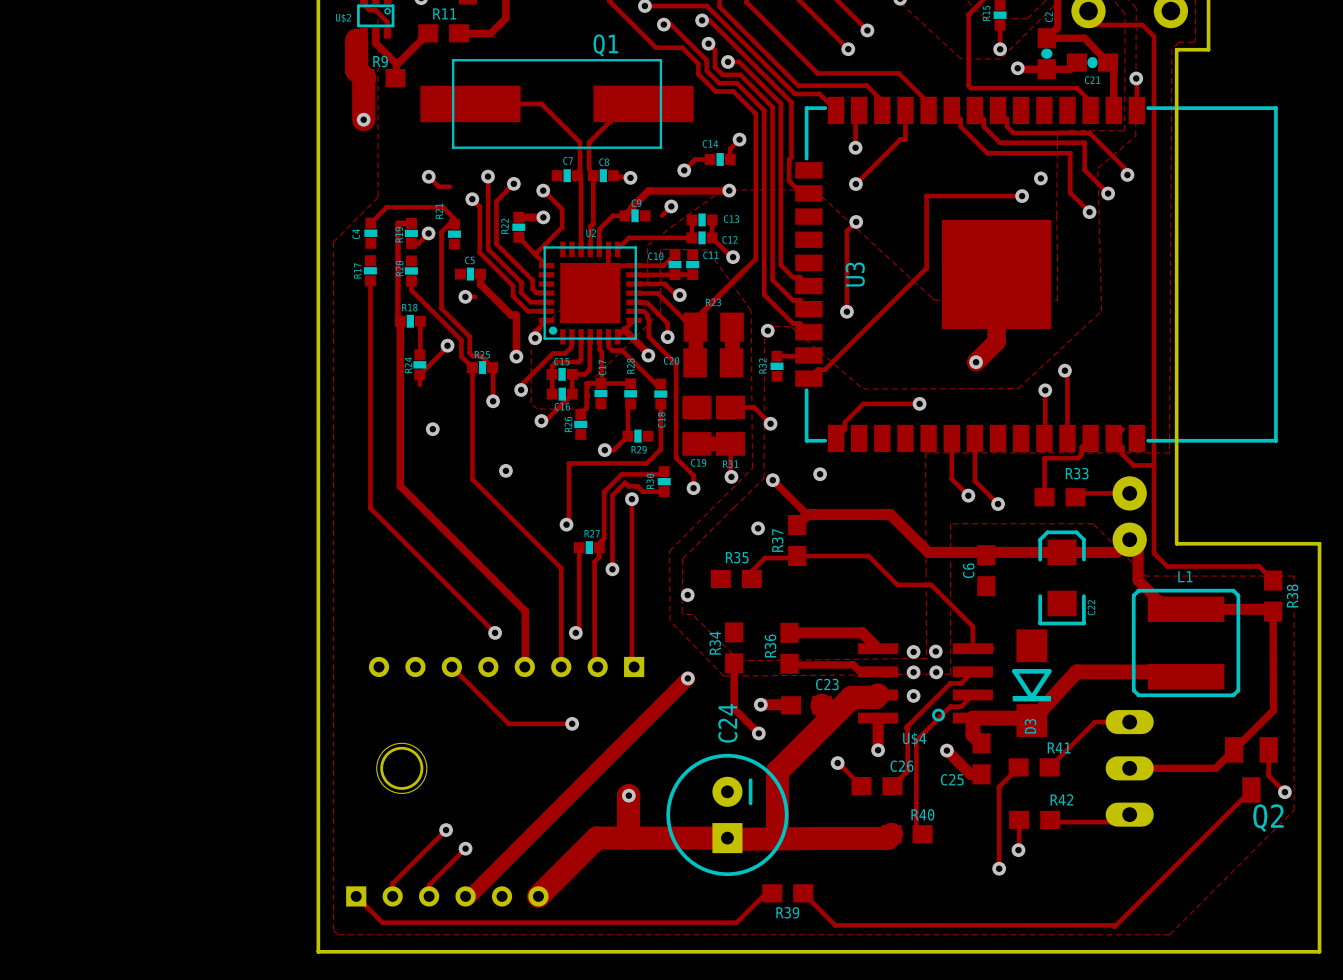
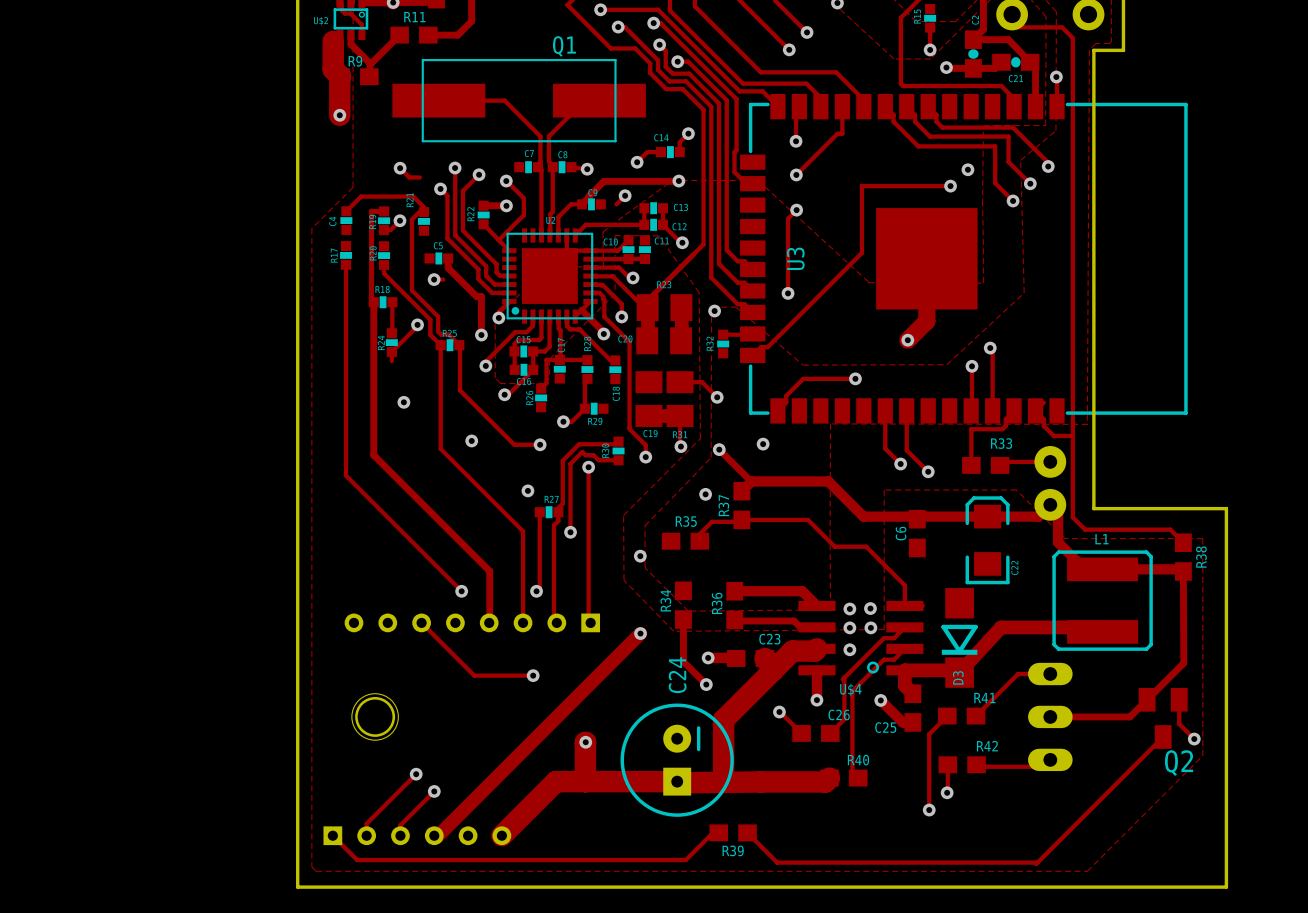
zone outline: (764, 326) (764, 478) (682, 558) (682, 613) (692, 614) (739, 660) (926, 658) (925, 452) (1170, 452) -> (711, 307) (711, 457) (645, 525) (645, 568) (688, 611) (830, 609) (830, 423) (1087, 424)
track: (493, 368) (493, 401) -> (459, 345) (459, 390) (514, 444) (540, 444)
via: (493, 401) -> none
track: (660, 404) (660, 449) (646, 463) (569, 463) (569, 522) -> none
via: none -> (540, 444)

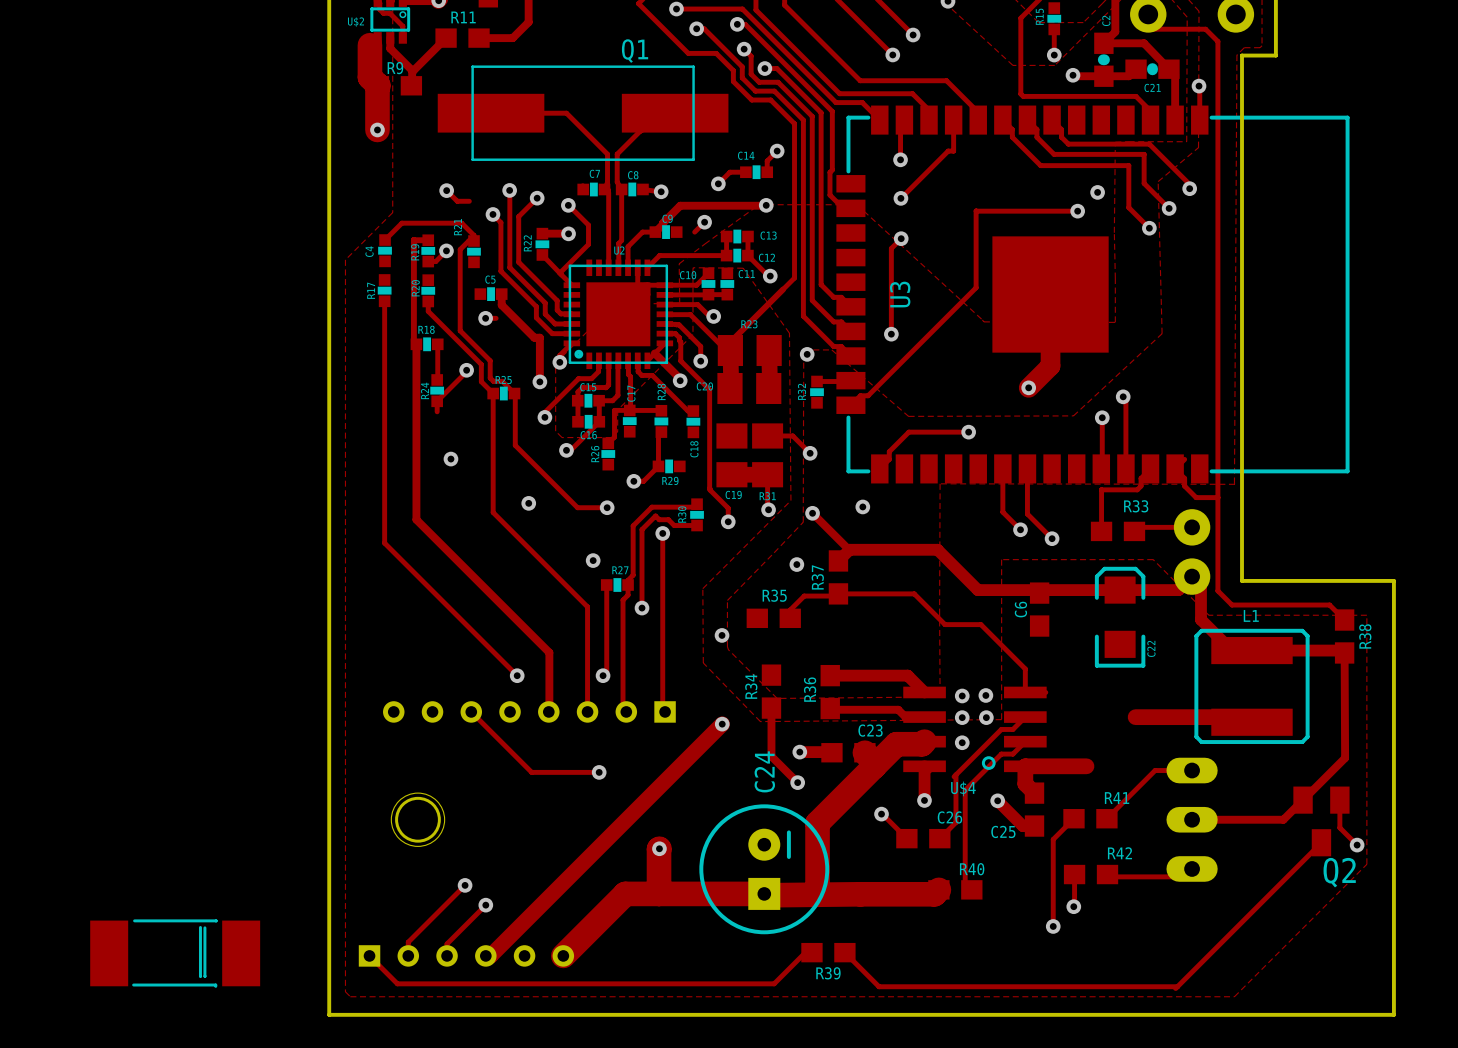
track: (1001, 627) (959, 672) (958, 670) -> none
D3: (959, 637) -> none
part: none -> (175, 953)

